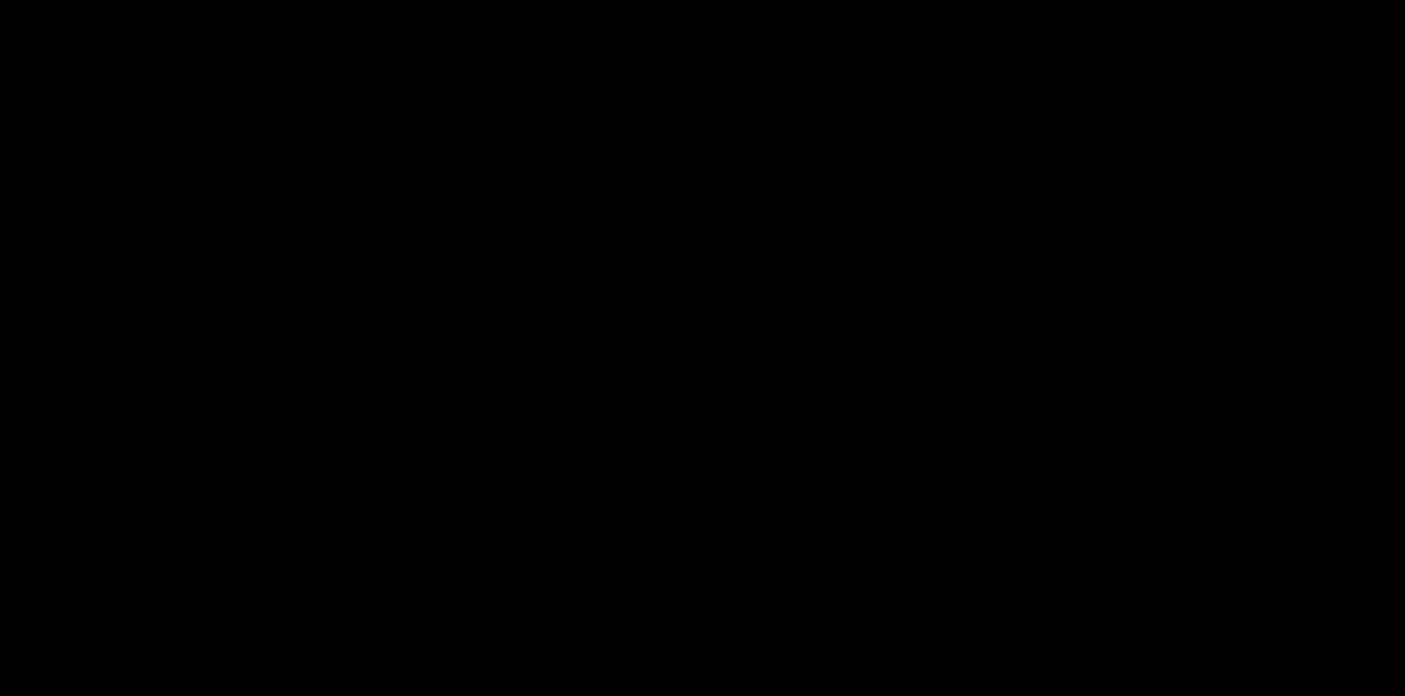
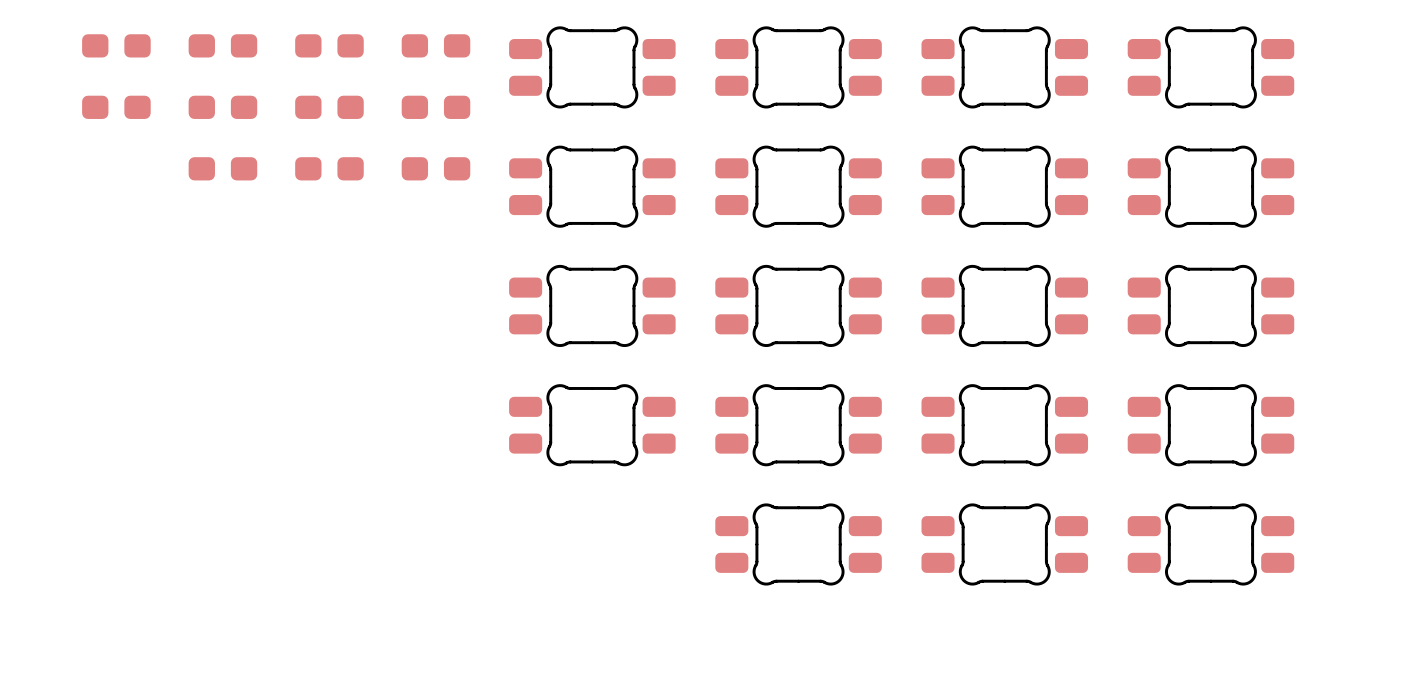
part: none -> (116, 45)
part: none -> (222, 45)
part: none -> (329, 45)
part: none -> (435, 45)
part: none -> (592, 67)
part: none -> (798, 67)
part: none -> (1004, 67)
part: none -> (1210, 67)
part: none -> (116, 107)
part: none -> (222, 107)
part: none -> (329, 107)
part: none -> (435, 107)
part: none -> (222, 168)
part: none -> (329, 168)
part: none -> (435, 168)
part: none -> (592, 186)
part: none -> (798, 186)
part: none -> (1004, 186)
part: none -> (1210, 186)
part: none -> (592, 305)
part: none -> (798, 305)
part: none -> (1004, 305)
part: none -> (1210, 305)
part: none -> (592, 425)
part: none -> (798, 425)
part: none -> (1004, 425)
part: none -> (1210, 425)
part: none -> (798, 544)
part: none -> (1004, 544)
part: none -> (1210, 544)

